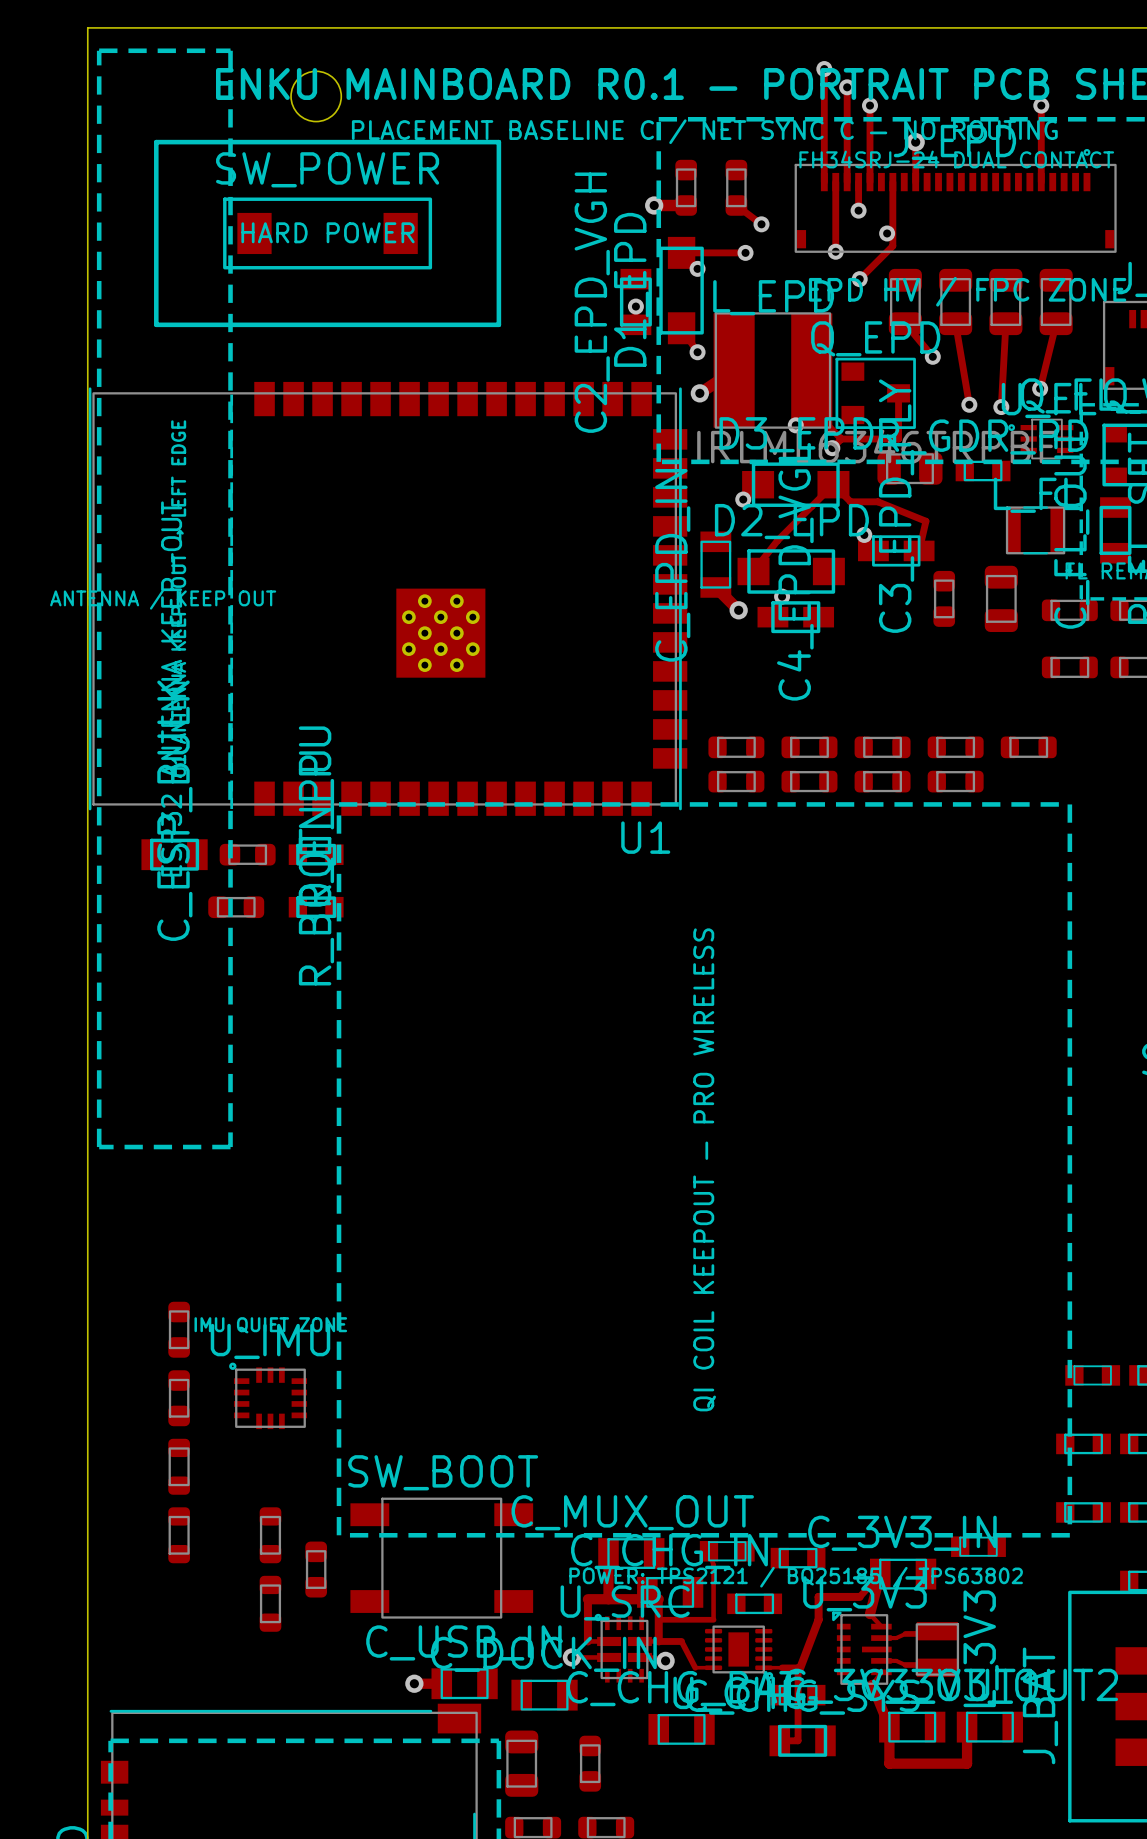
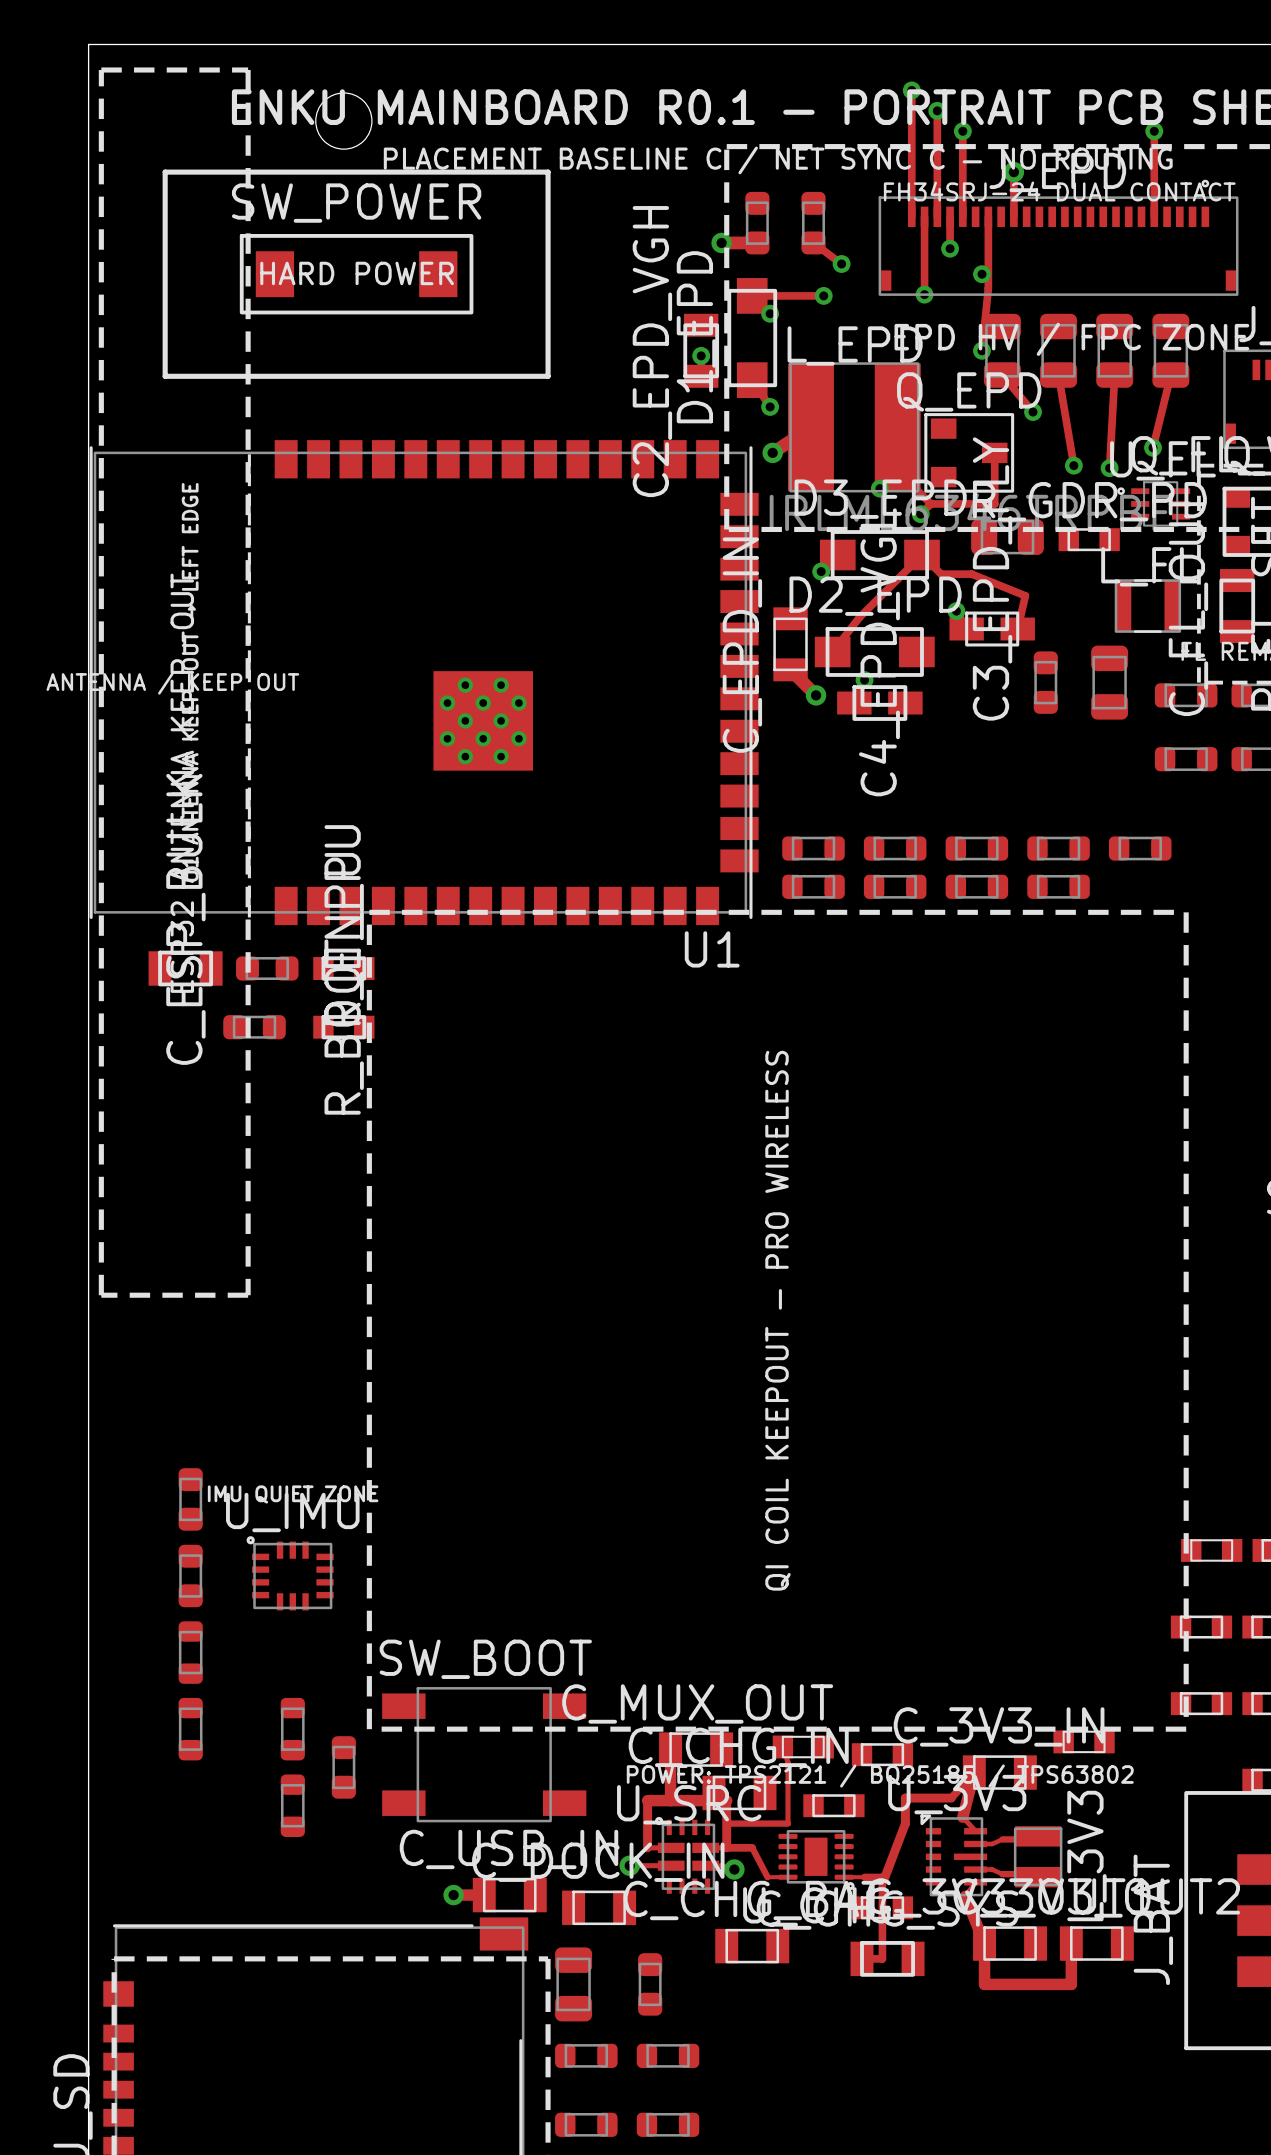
track: (892, 246) (859, 279) -> (988, 288) (981, 350)
via position: (859, 279) -> (981, 350)

